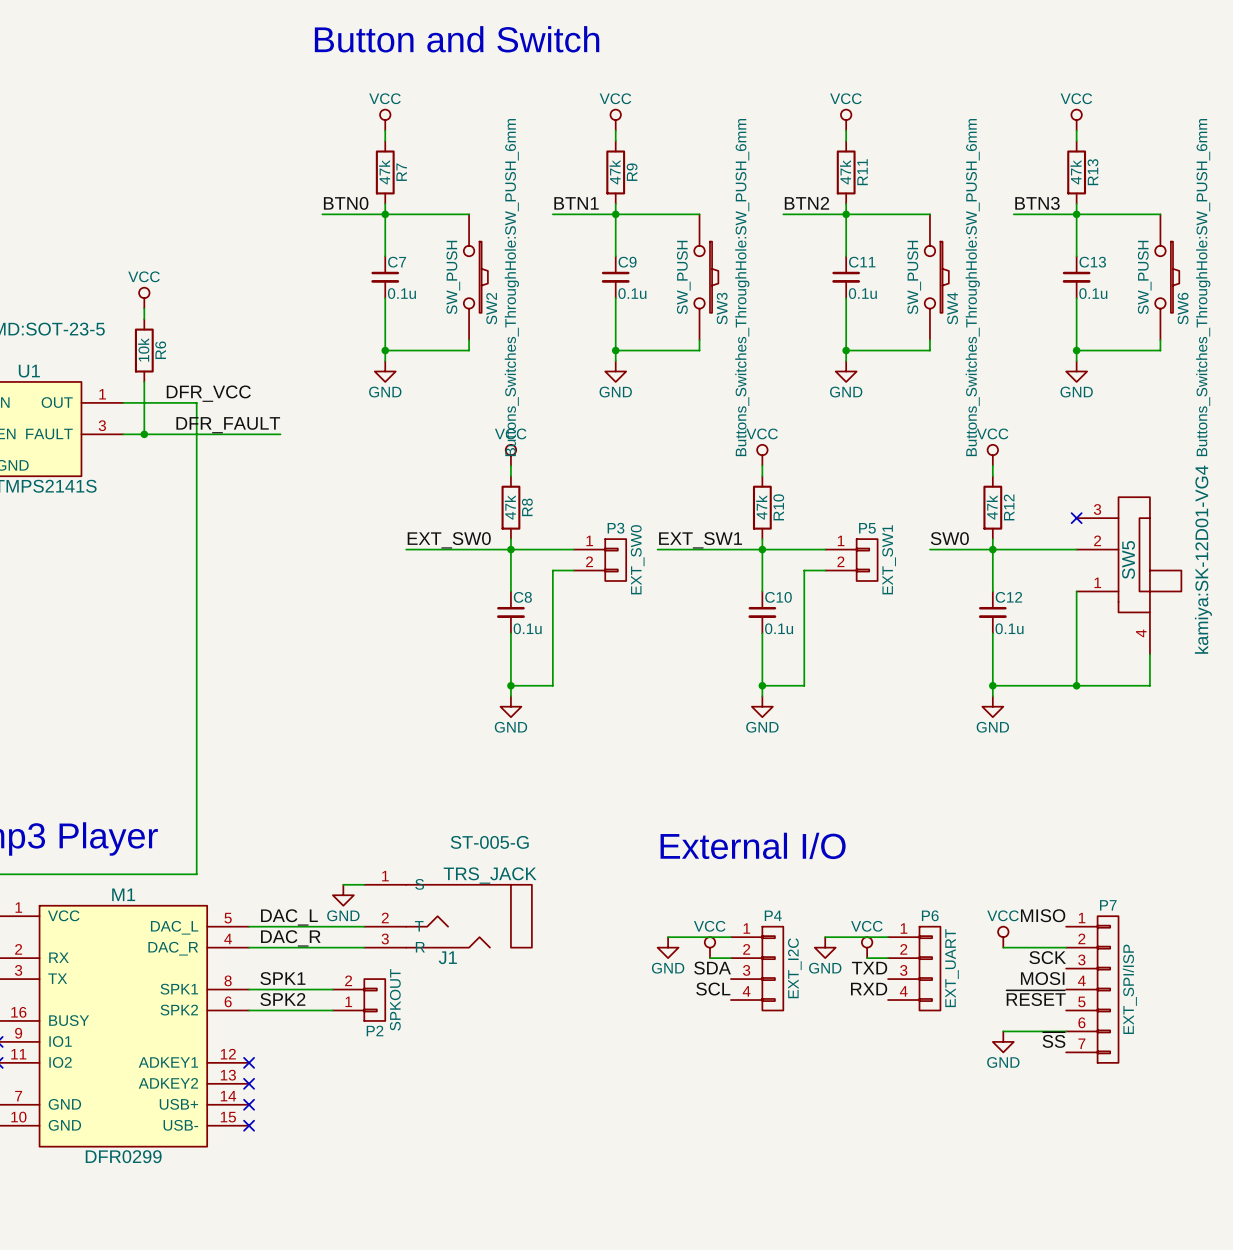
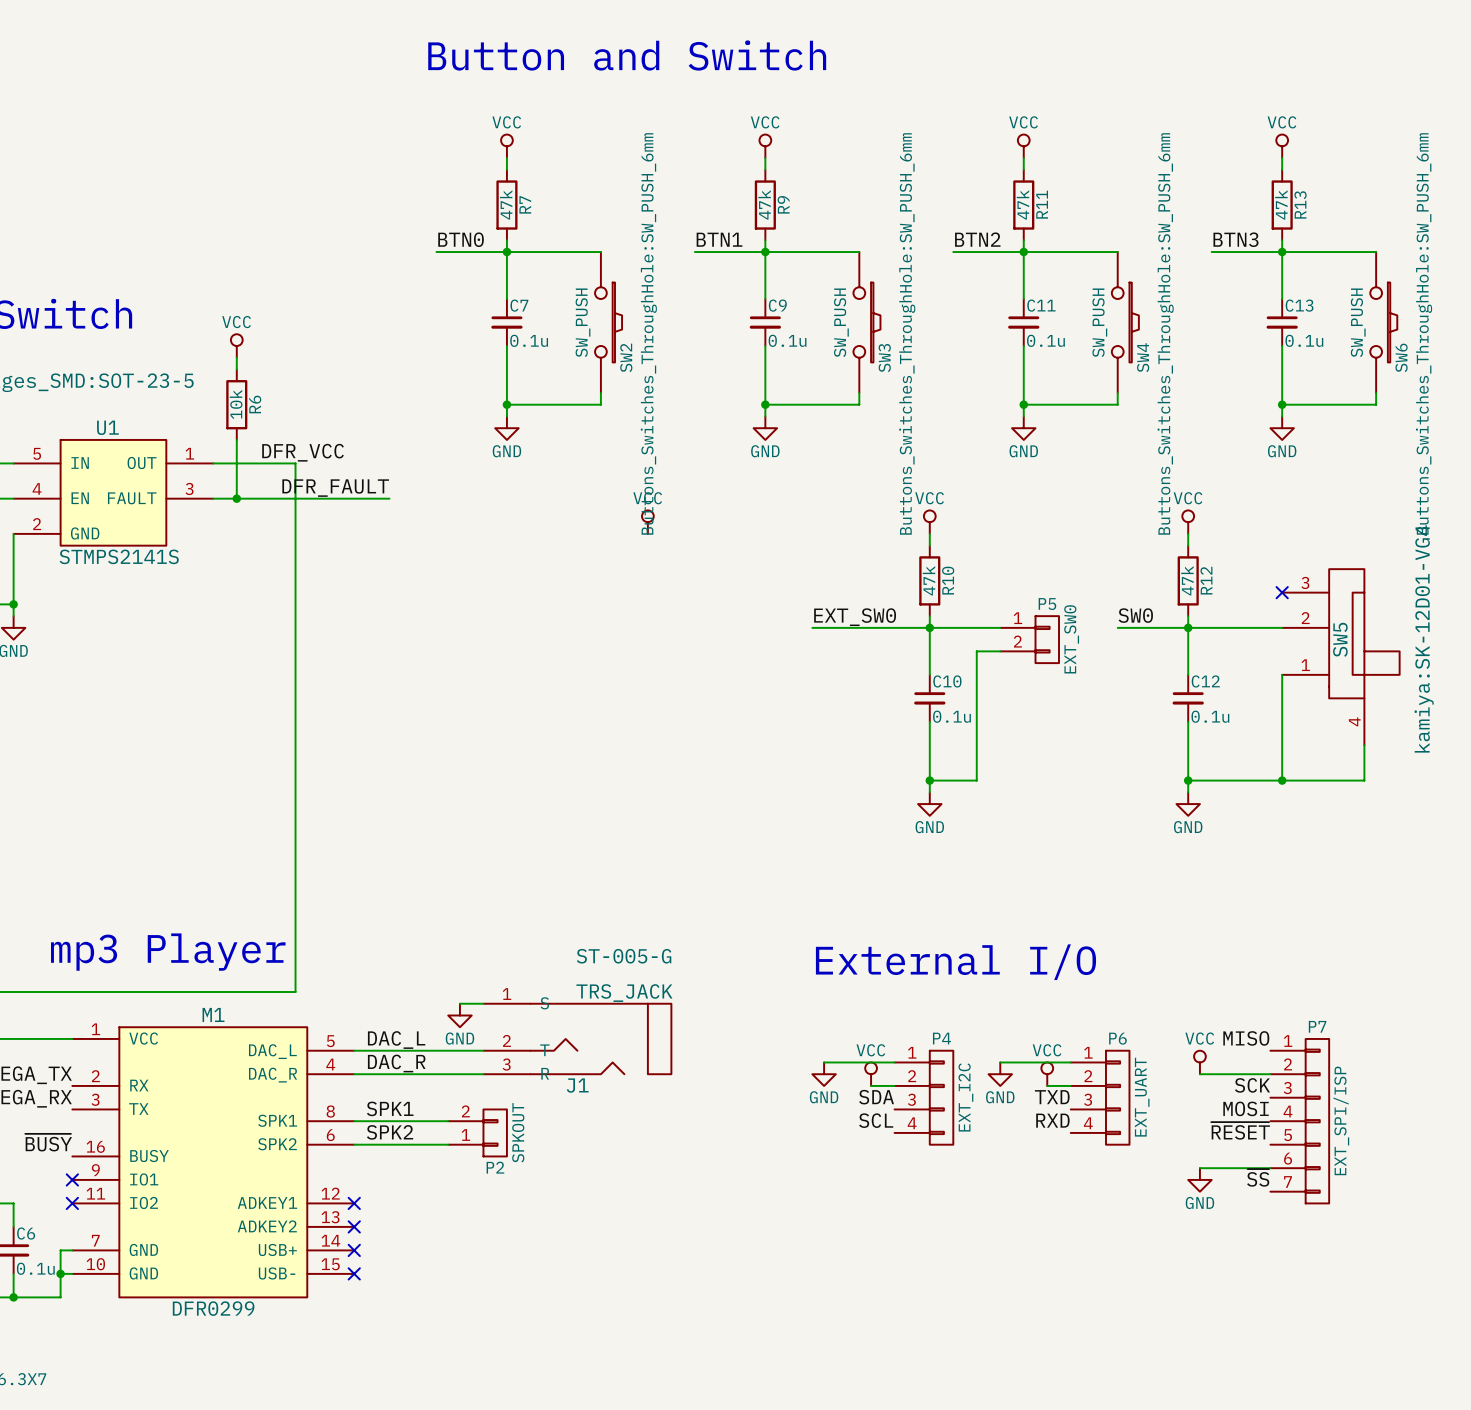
wire: (510, 465) (510, 476) -> none
R8: 47k (510, 507) -> none
wire: (510, 539) (510, 591) -> none
label: EXT_SW0 (449, 540) -> none
label: EXT_SW1 (700, 540) -> EXT_SW0 (855, 617)
wire: (406, 549) (573, 549) -> none
junction: (510, 549) -> none
P5 value: EXT_SW1 (889, 559) -> EXT_SW0 (1071, 639)
P3: EXT_SW0 (600, 560) -> none
wire: (573, 570) (552, 570) (552, 685) (510, 685) -> none
C8: 0.1u (510, 612) -> none
wire: (510, 633) (510, 696) -> none
junction: (510, 685) -> none
power symbol: GND (510, 706) -> none

